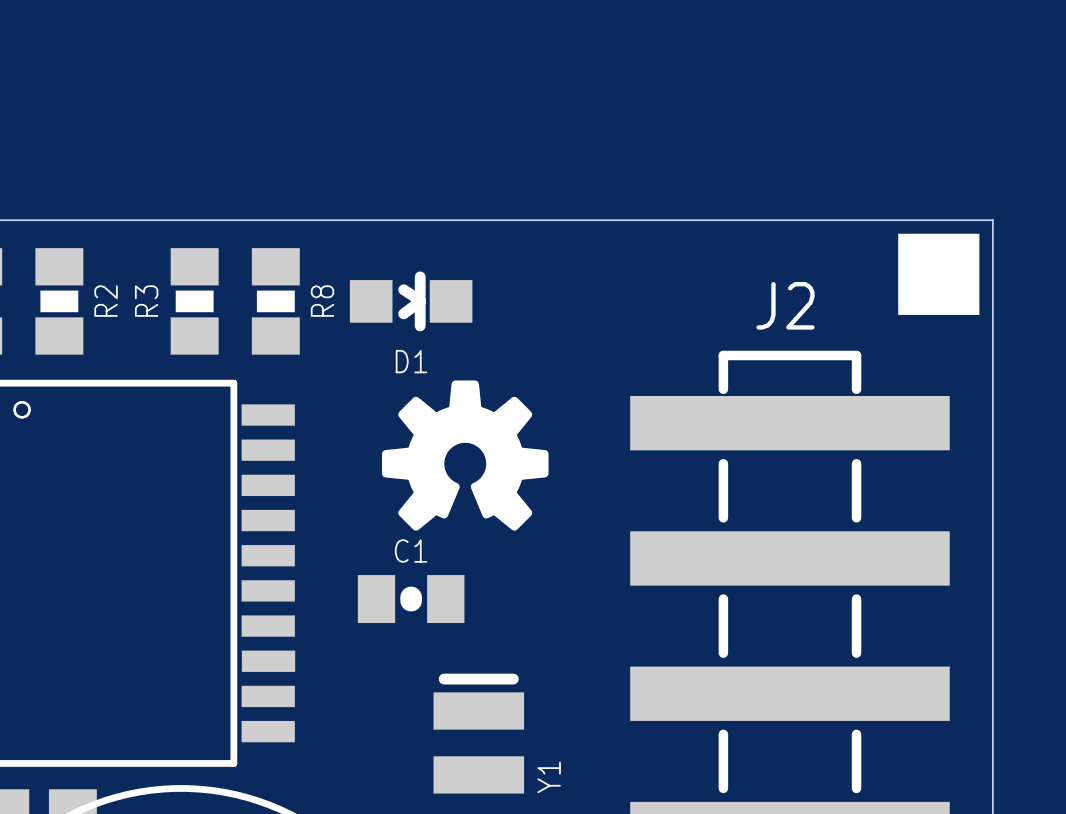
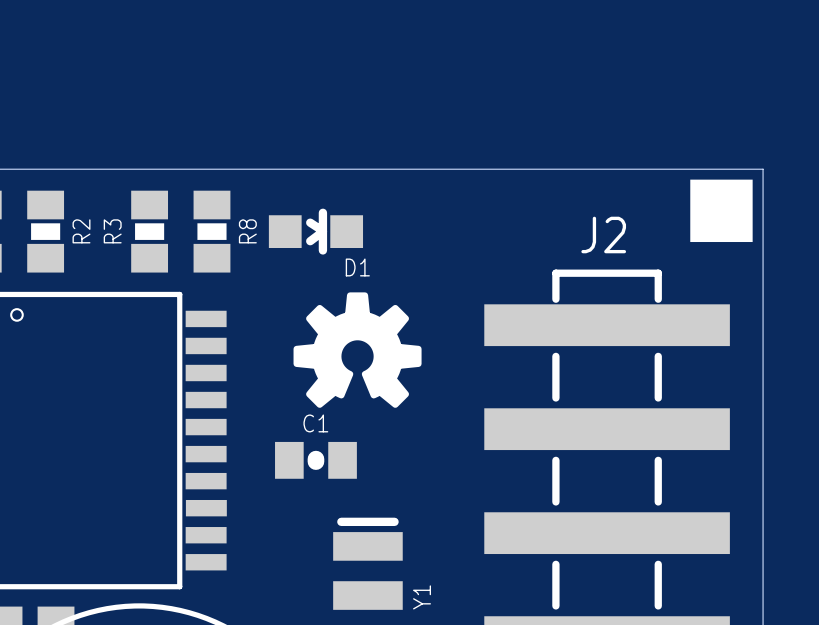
D1 name position: D1 (411, 361) -> D1 (357, 267)

